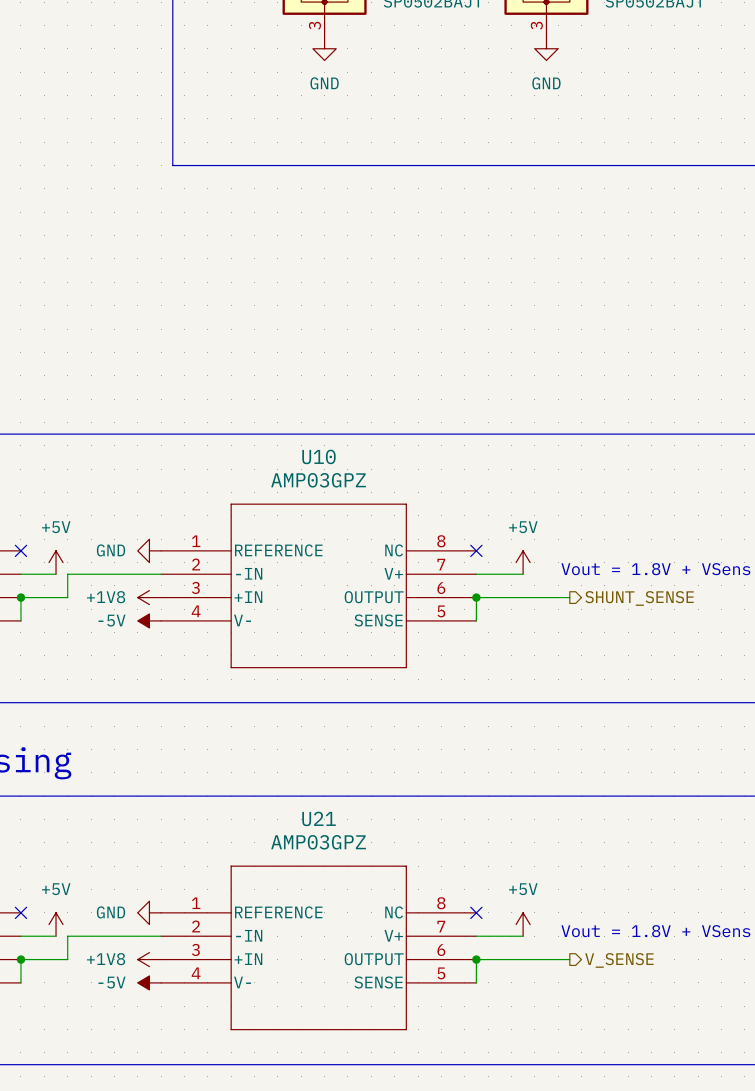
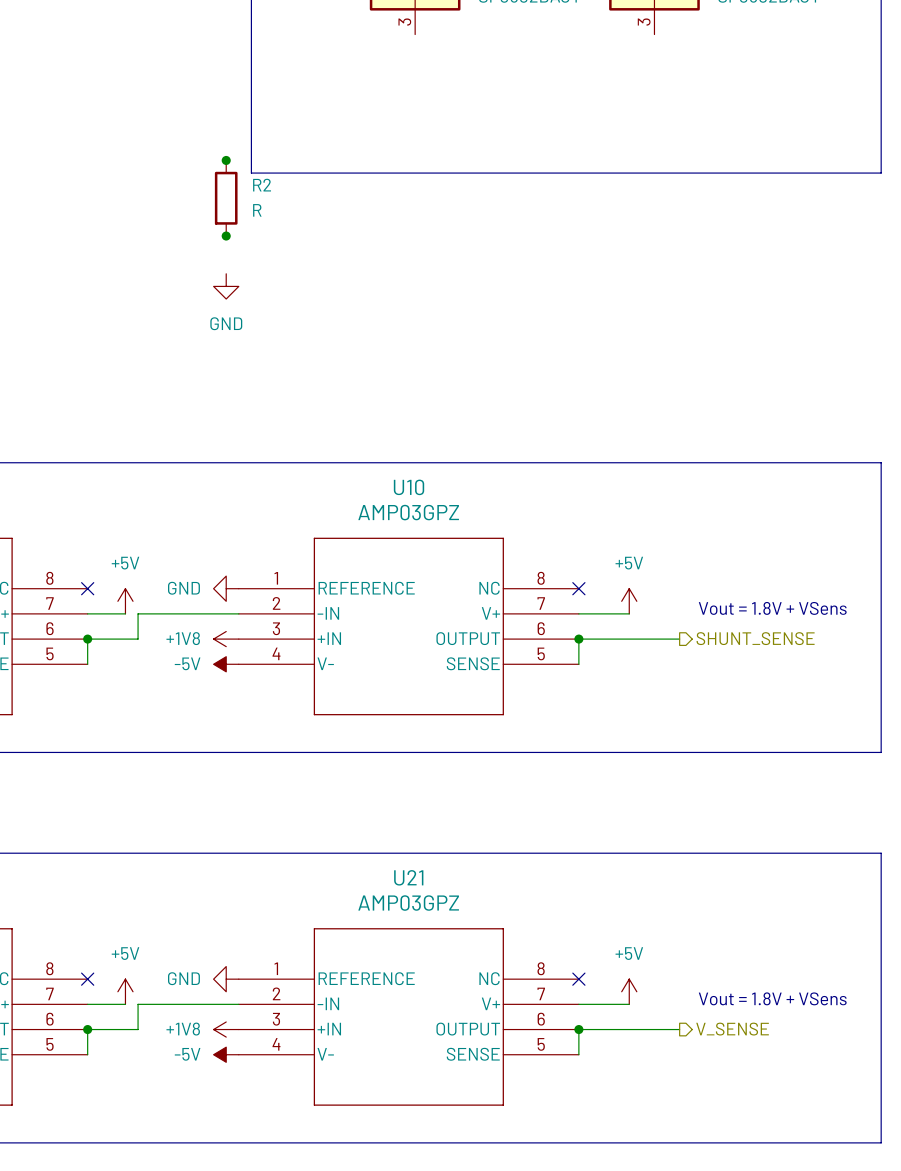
power symbol: GND (324, 48) -> none
power symbol: GND (546, 48) -> none
junction: none -> (226, 160)
R2: none -> R (226, 198)
junction: none -> (226, 236)
power symbol: none -> GND (226, 286)

